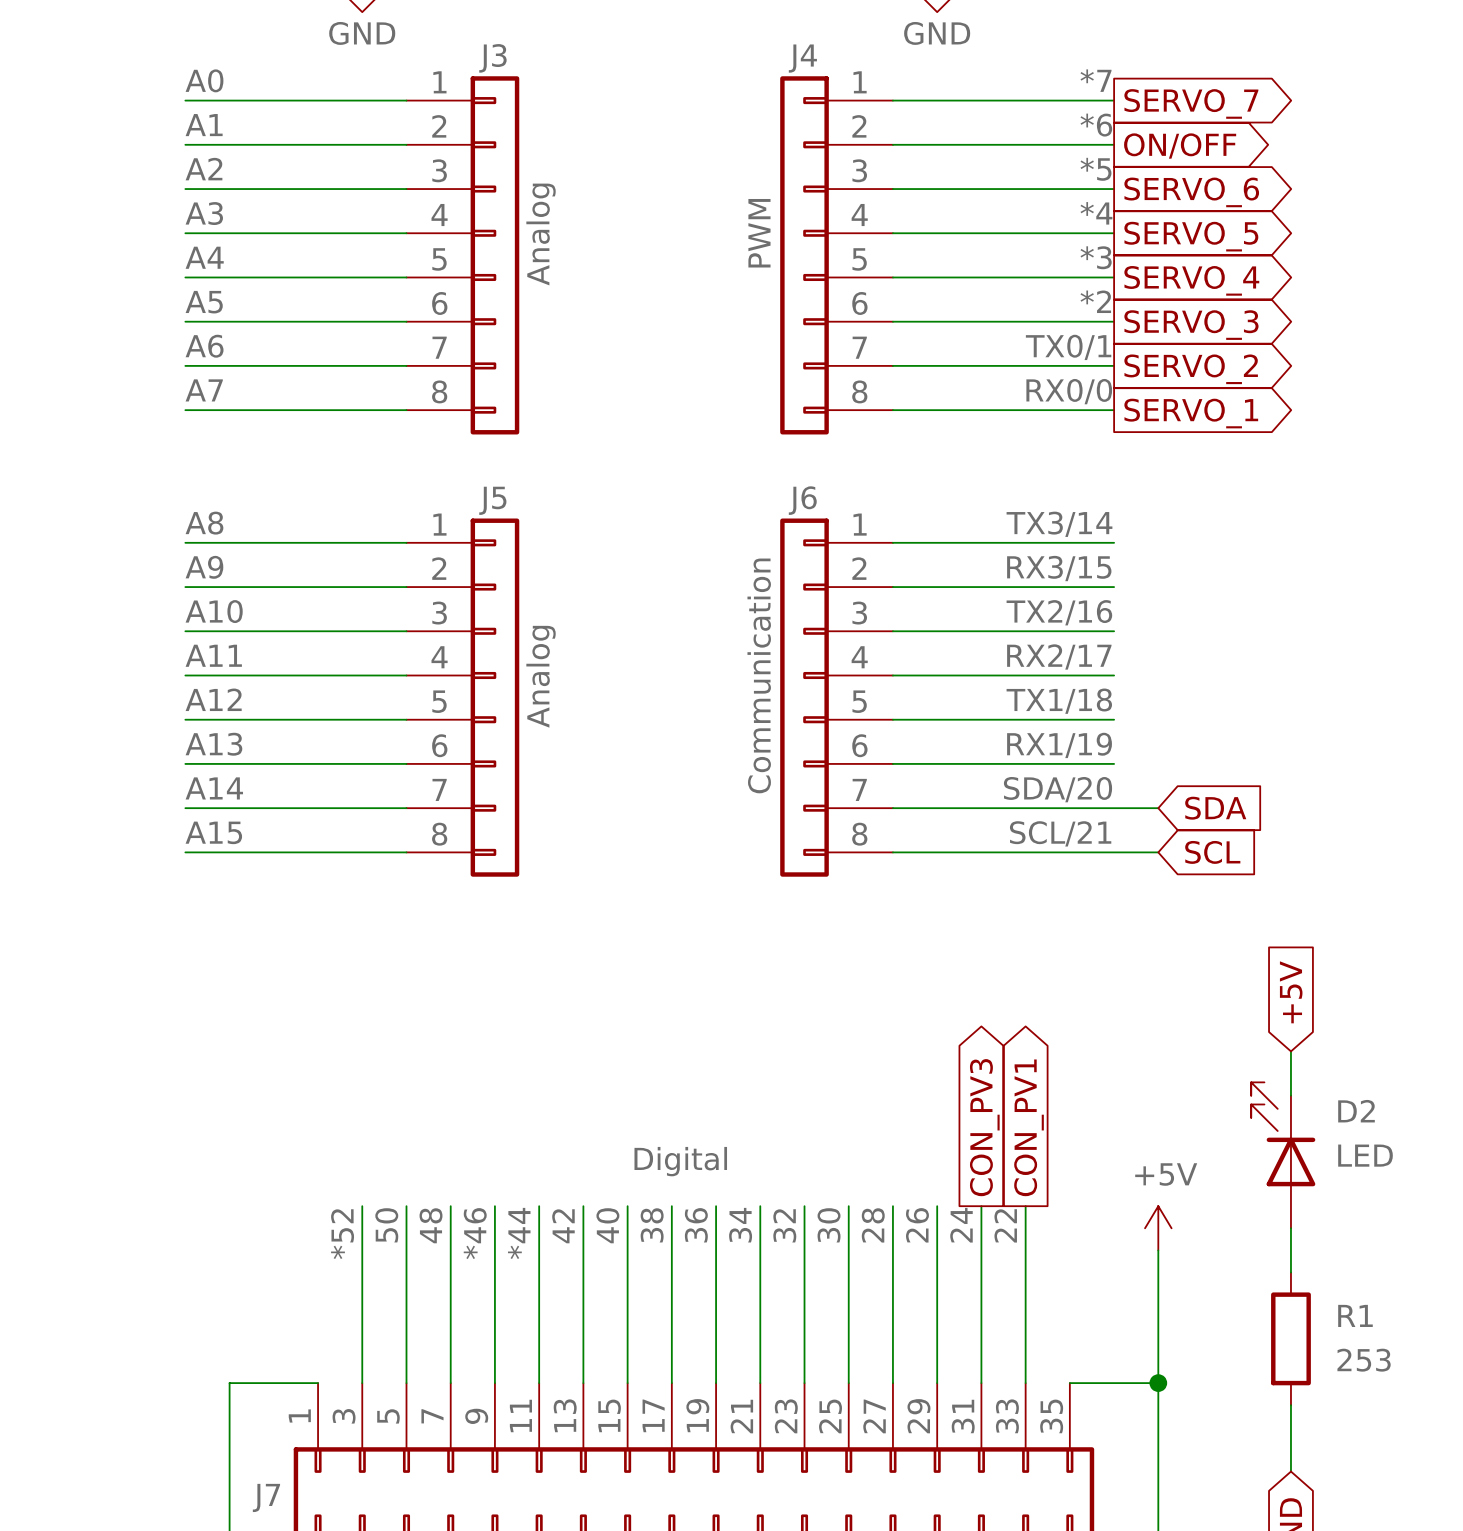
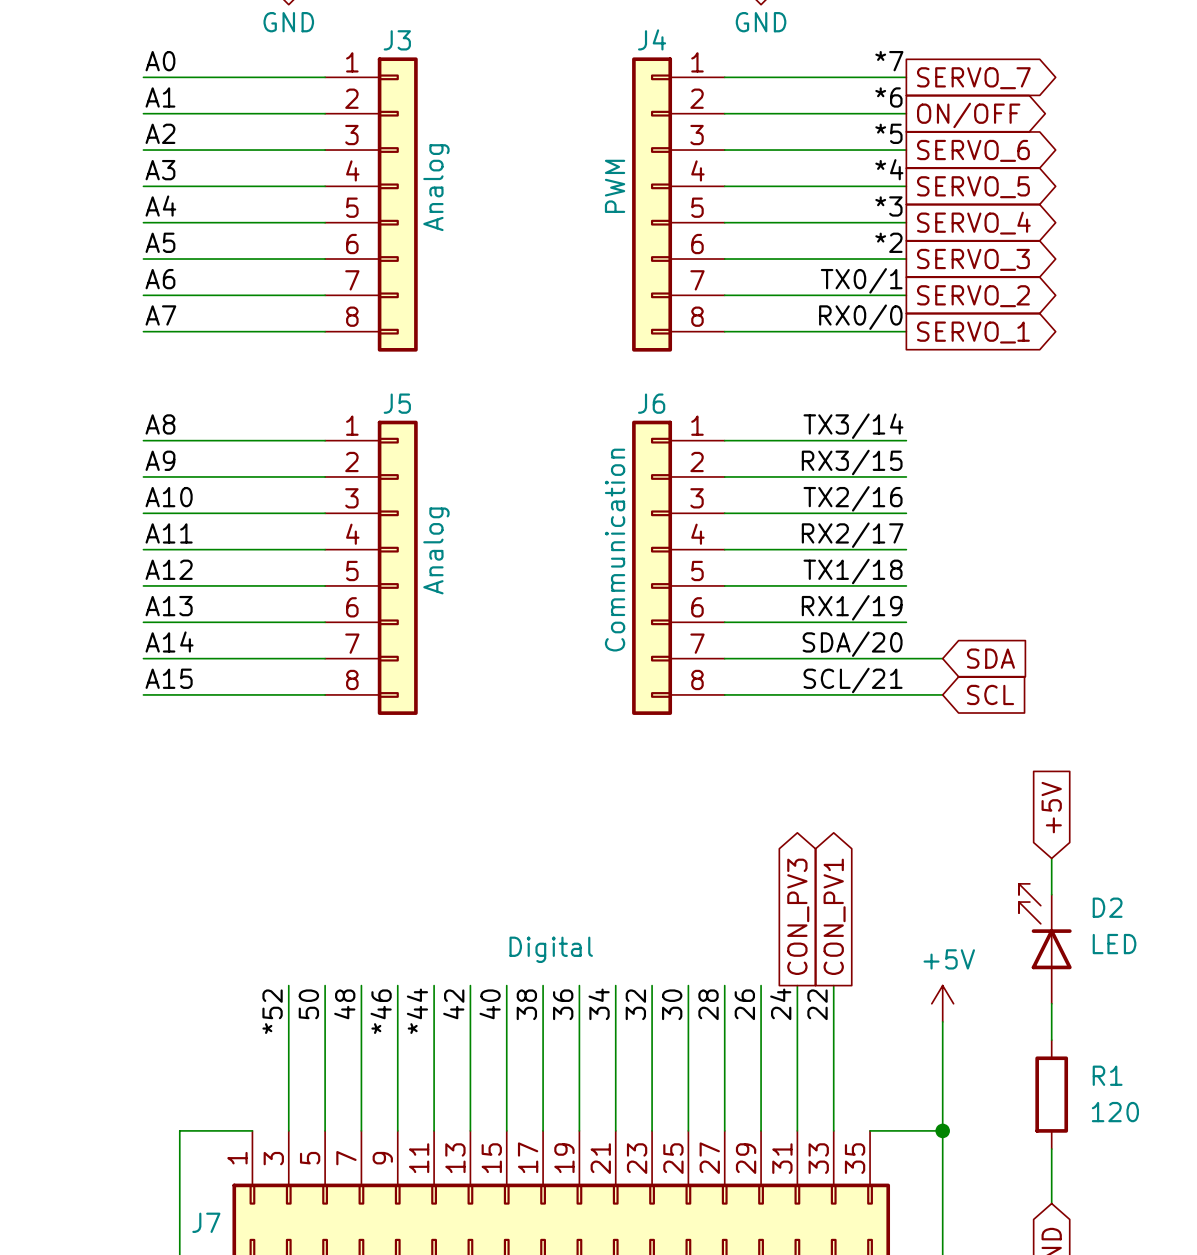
R1 value: 253 (1364, 1360) -> 120 (1115, 1112)

